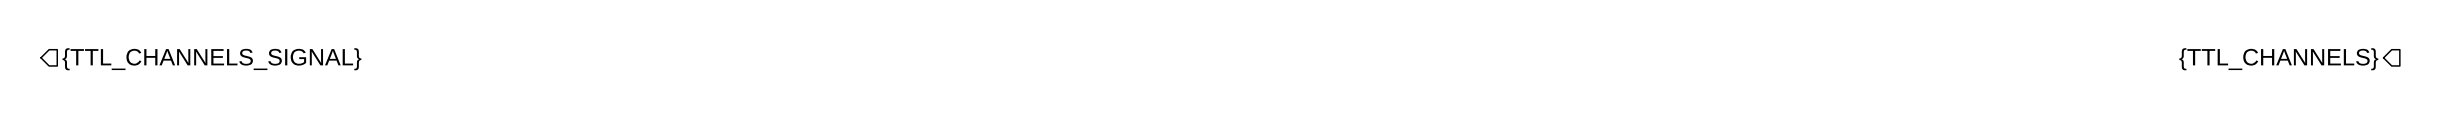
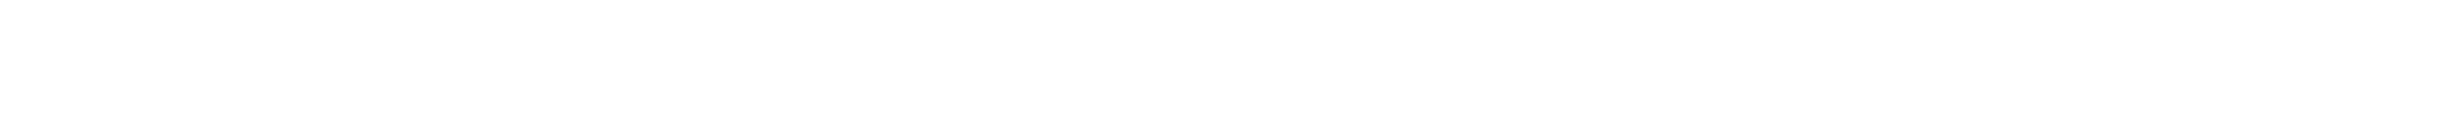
hierarchical label: {TTL_CHANNELS_SIGNAL} (211, 59) -> none
hierarchical label: {TTL_CHANNELS} (2278, 59) -> none

